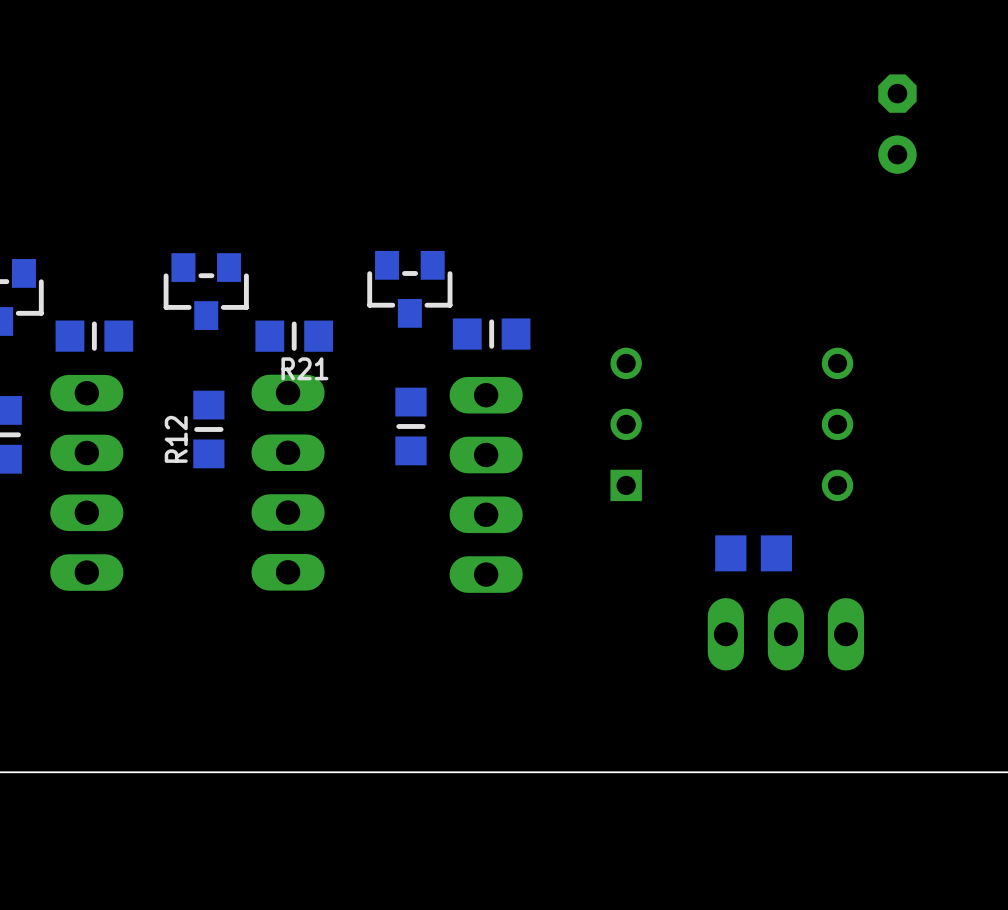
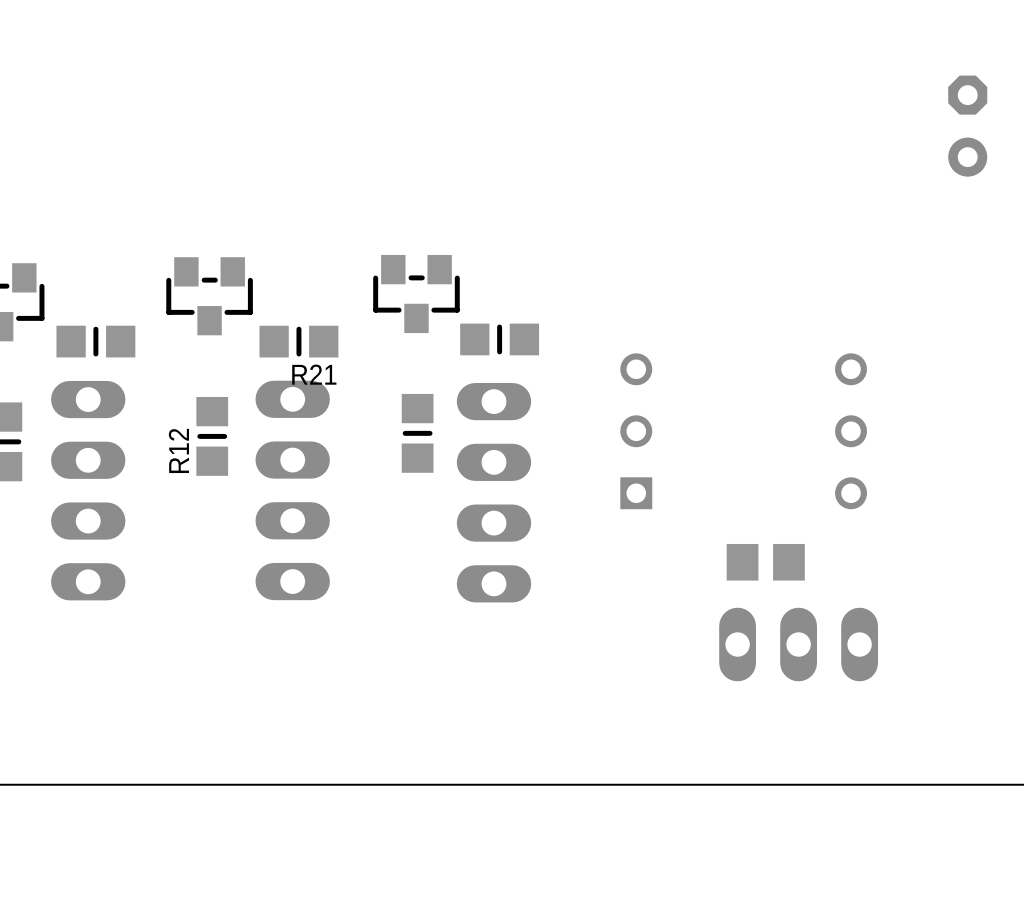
part position: (897, 124) -> (967, 126)

